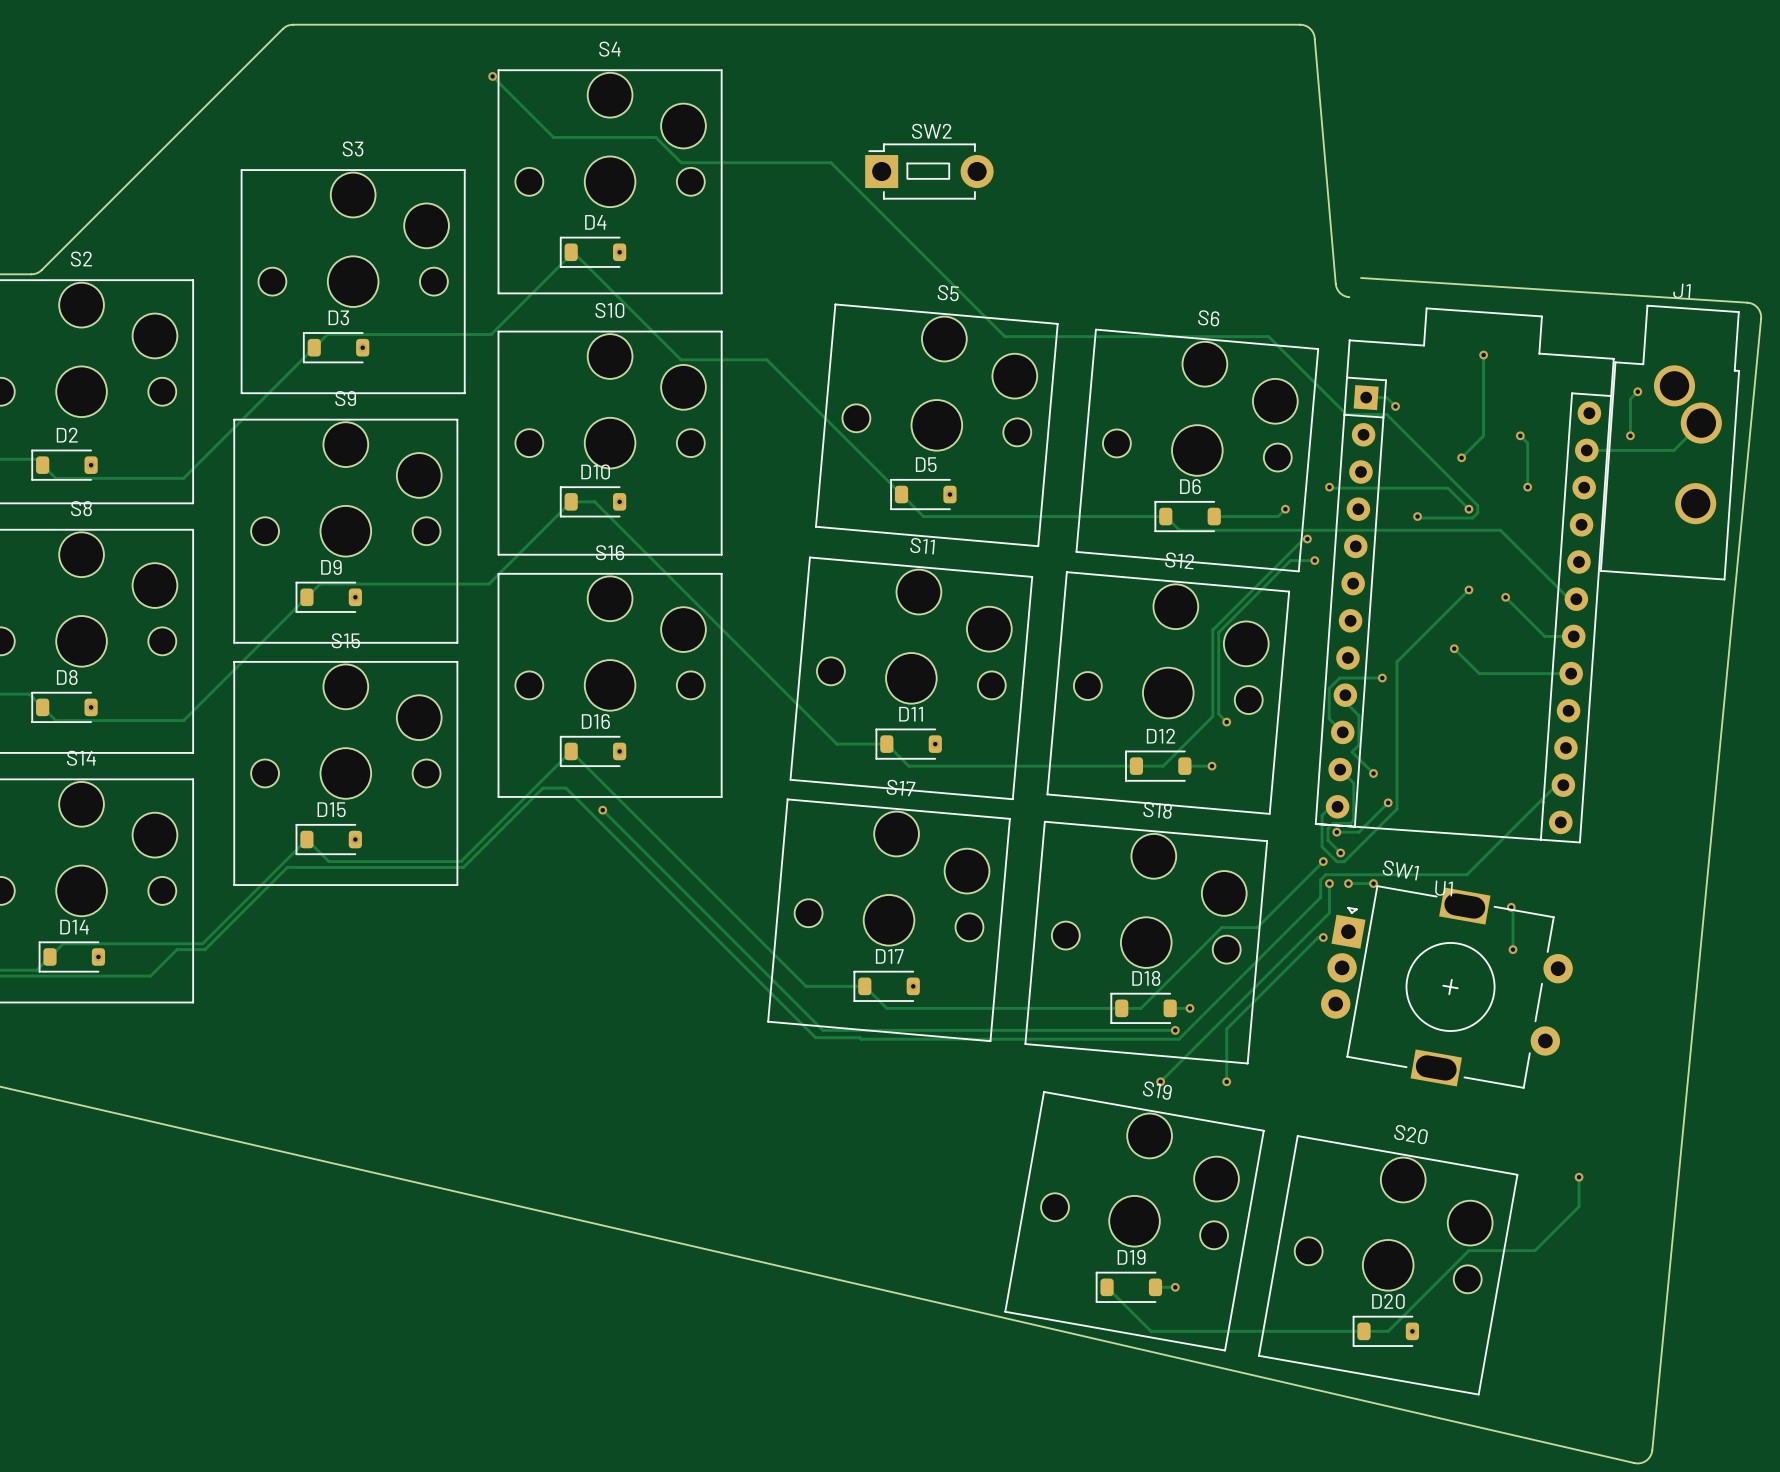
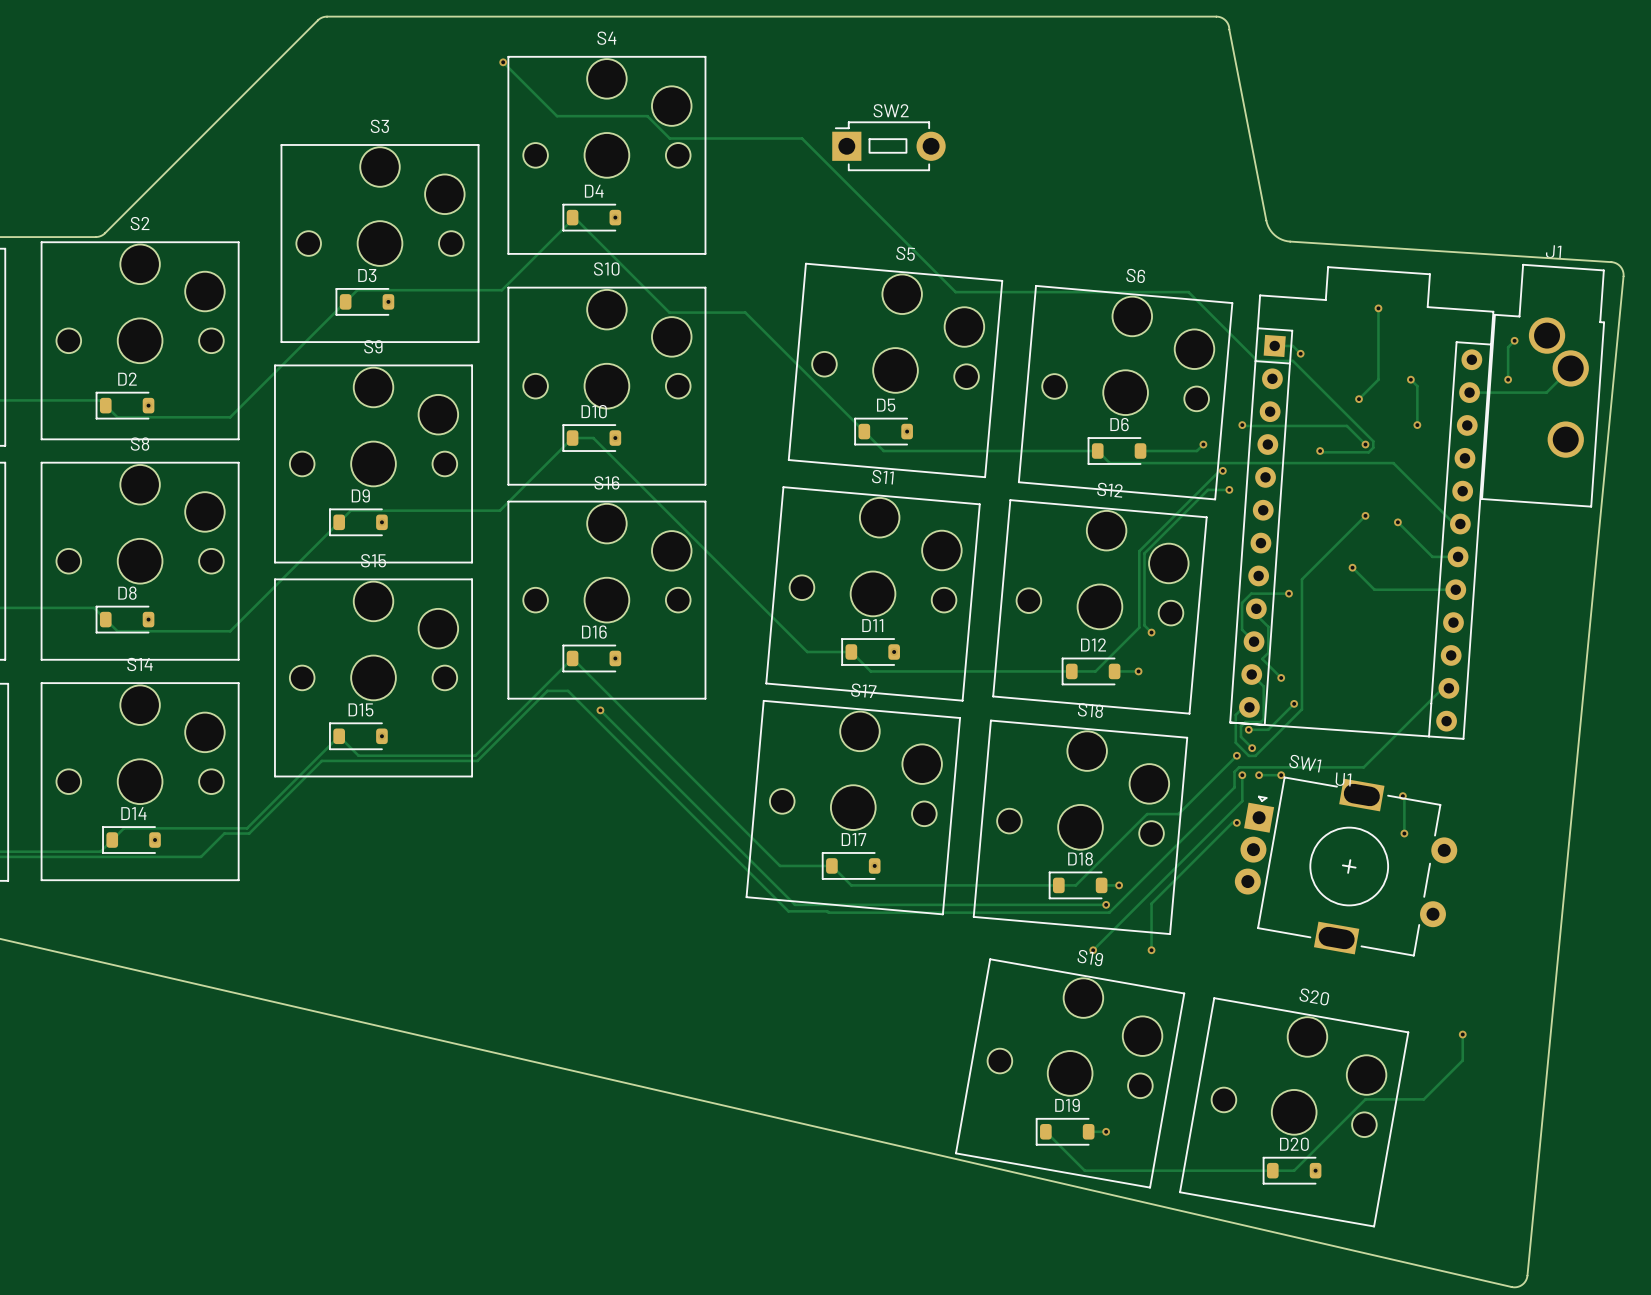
board edge: (1314, 39) (1335, 283) (1340, 293) (1349, 297) -> (1229, 29) (1267, 223) (1276, 236) (1290, 241)
board edge: (1361, 277) (1383, 279) -> none

